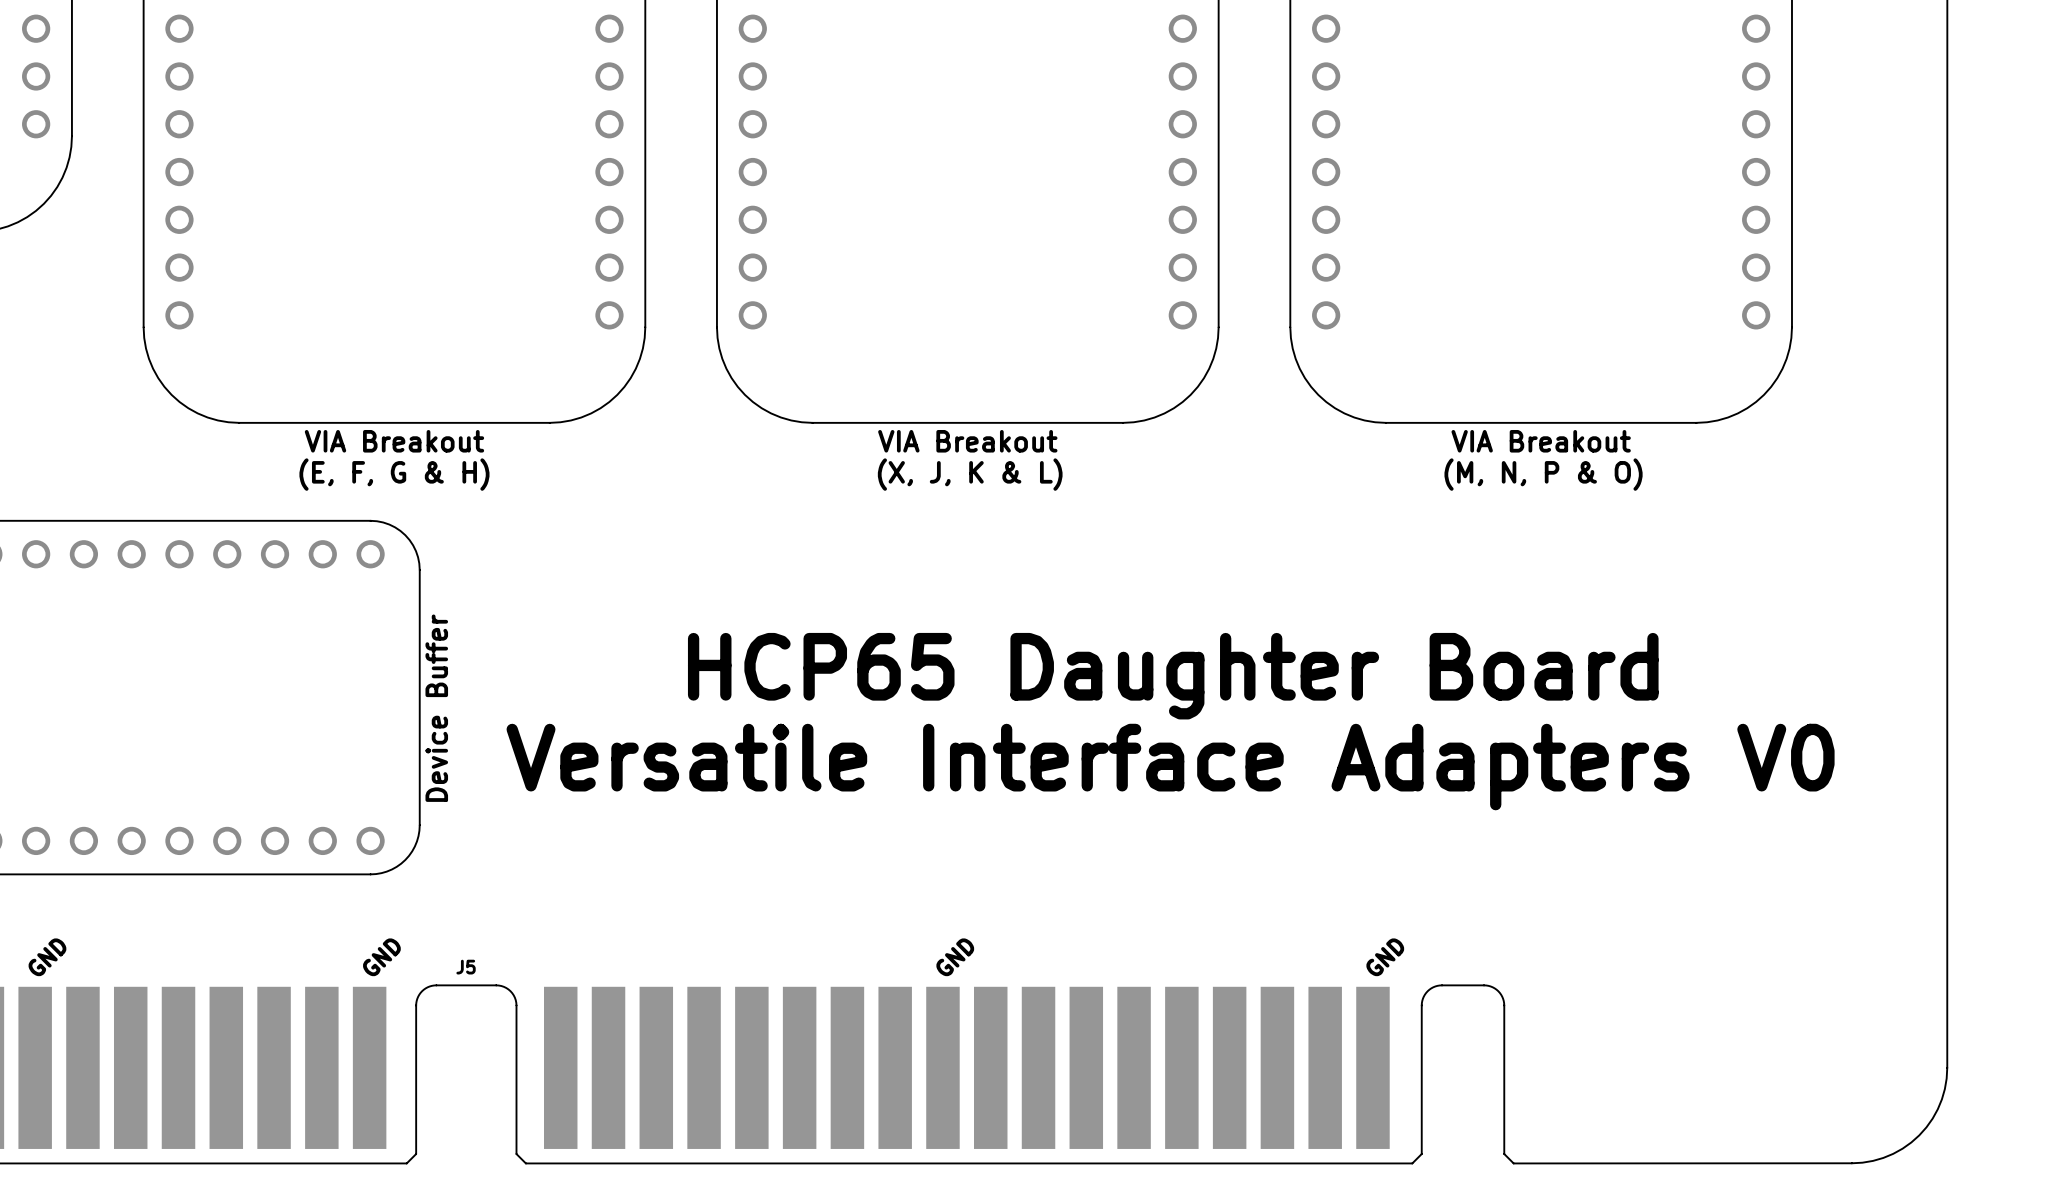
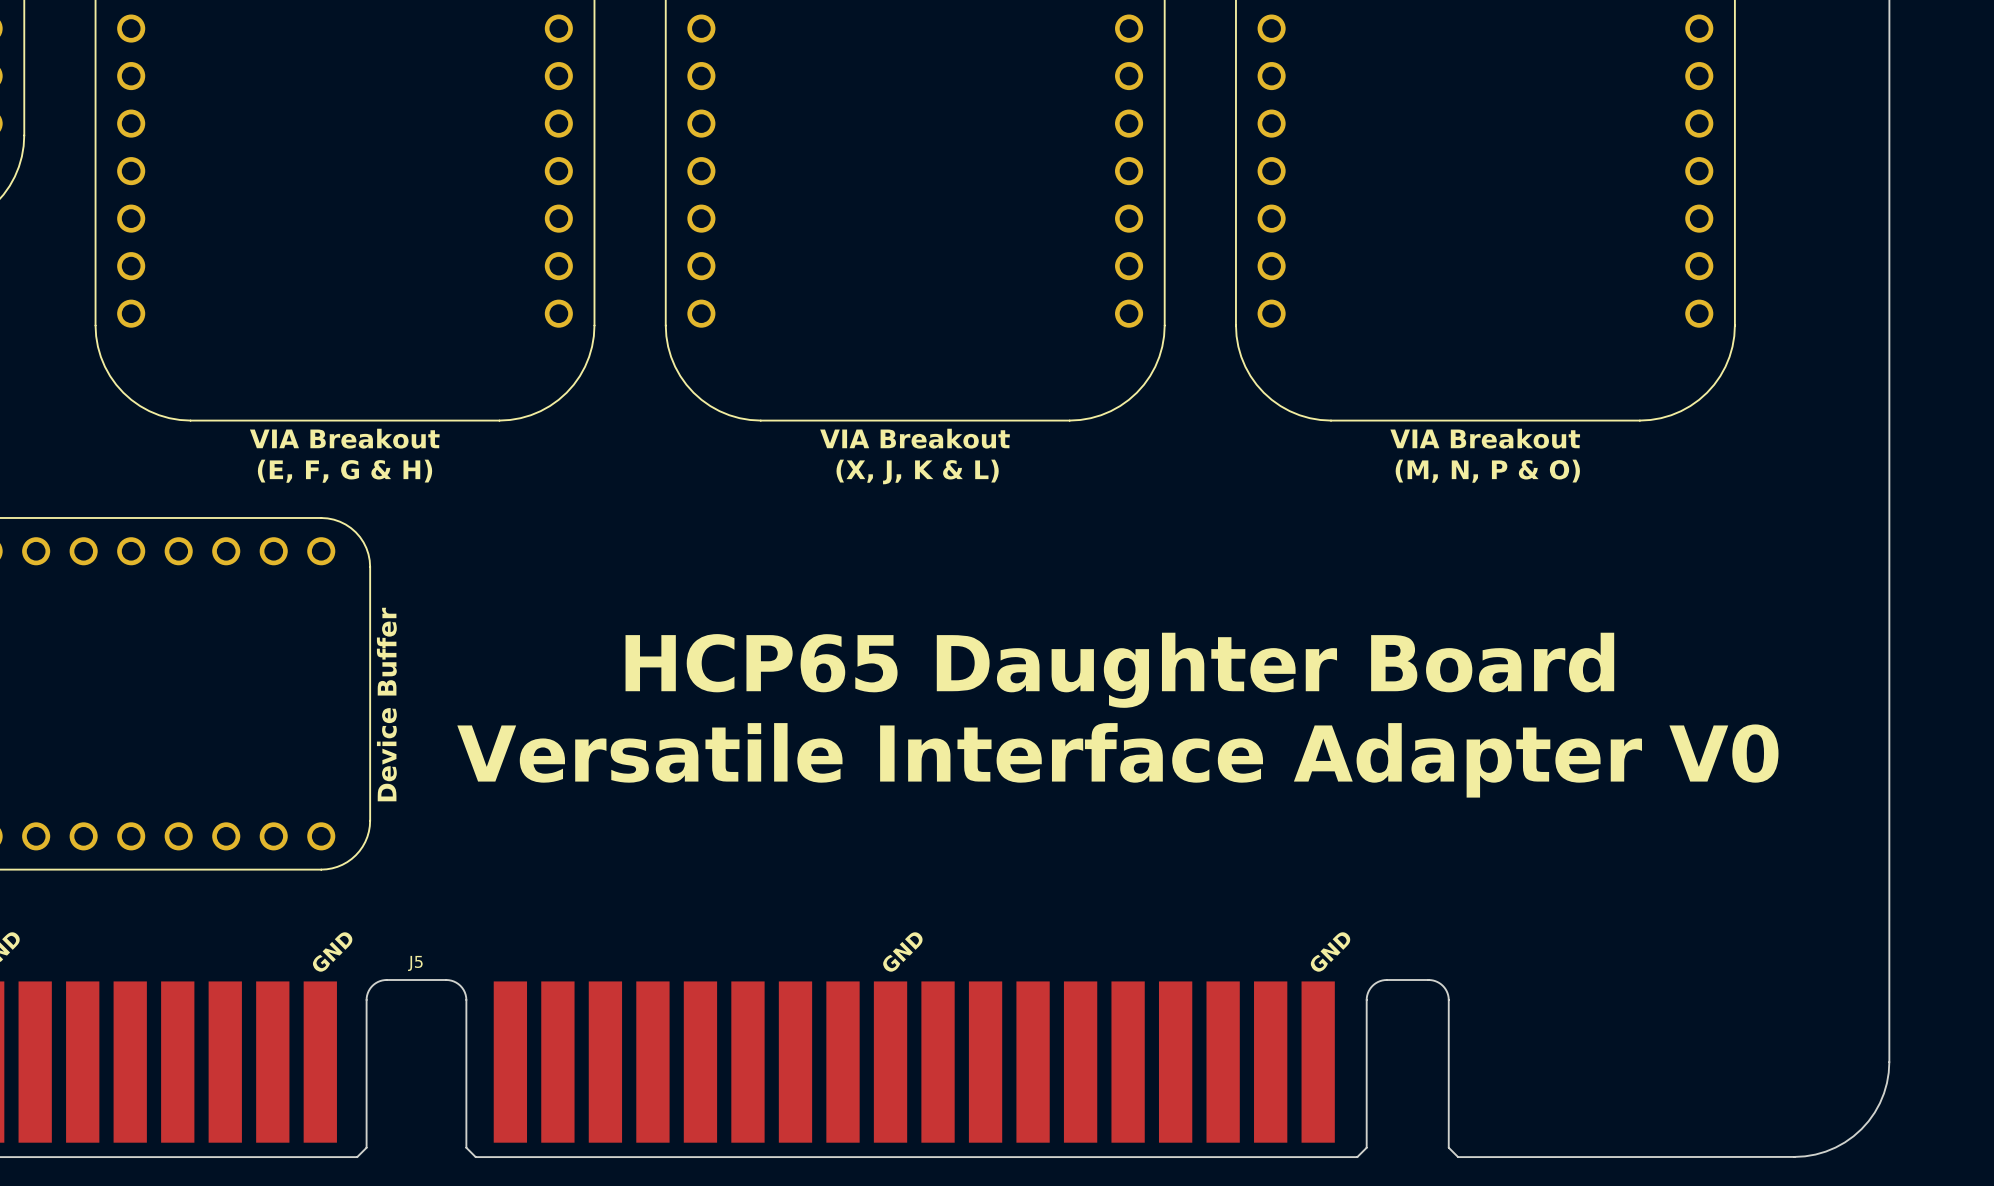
text: Versatile Interface Adapters V0 (1170, 767) -> Versatile Interface Adapter V0 (1117, 760)

